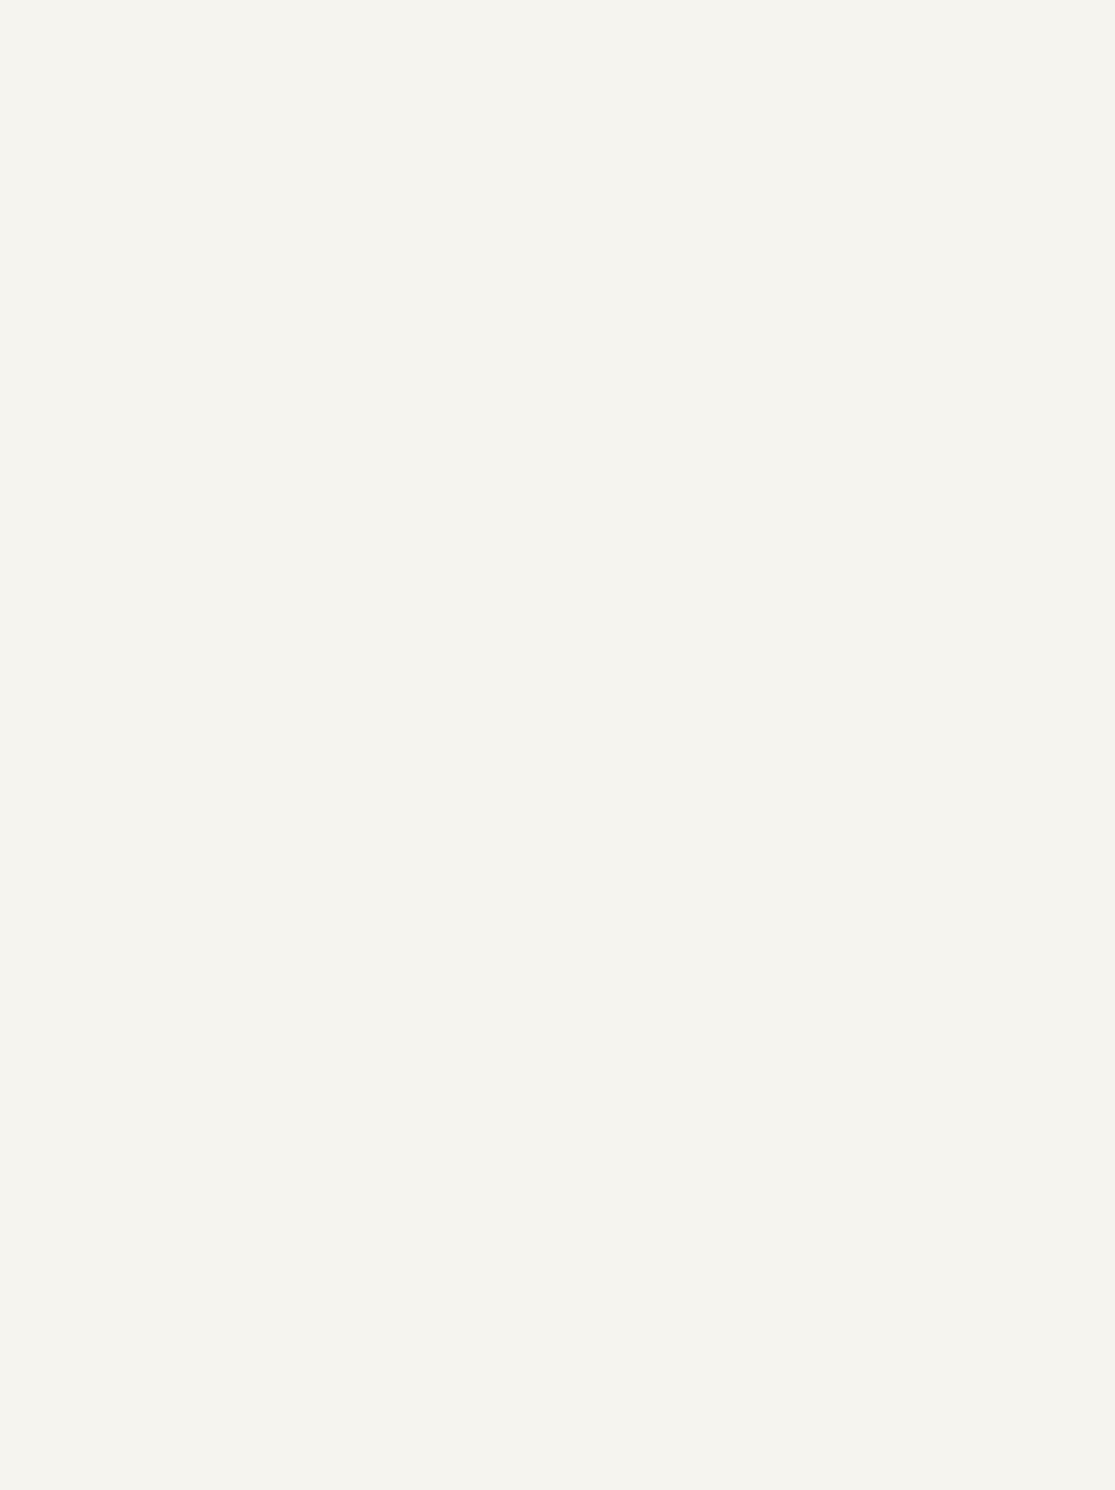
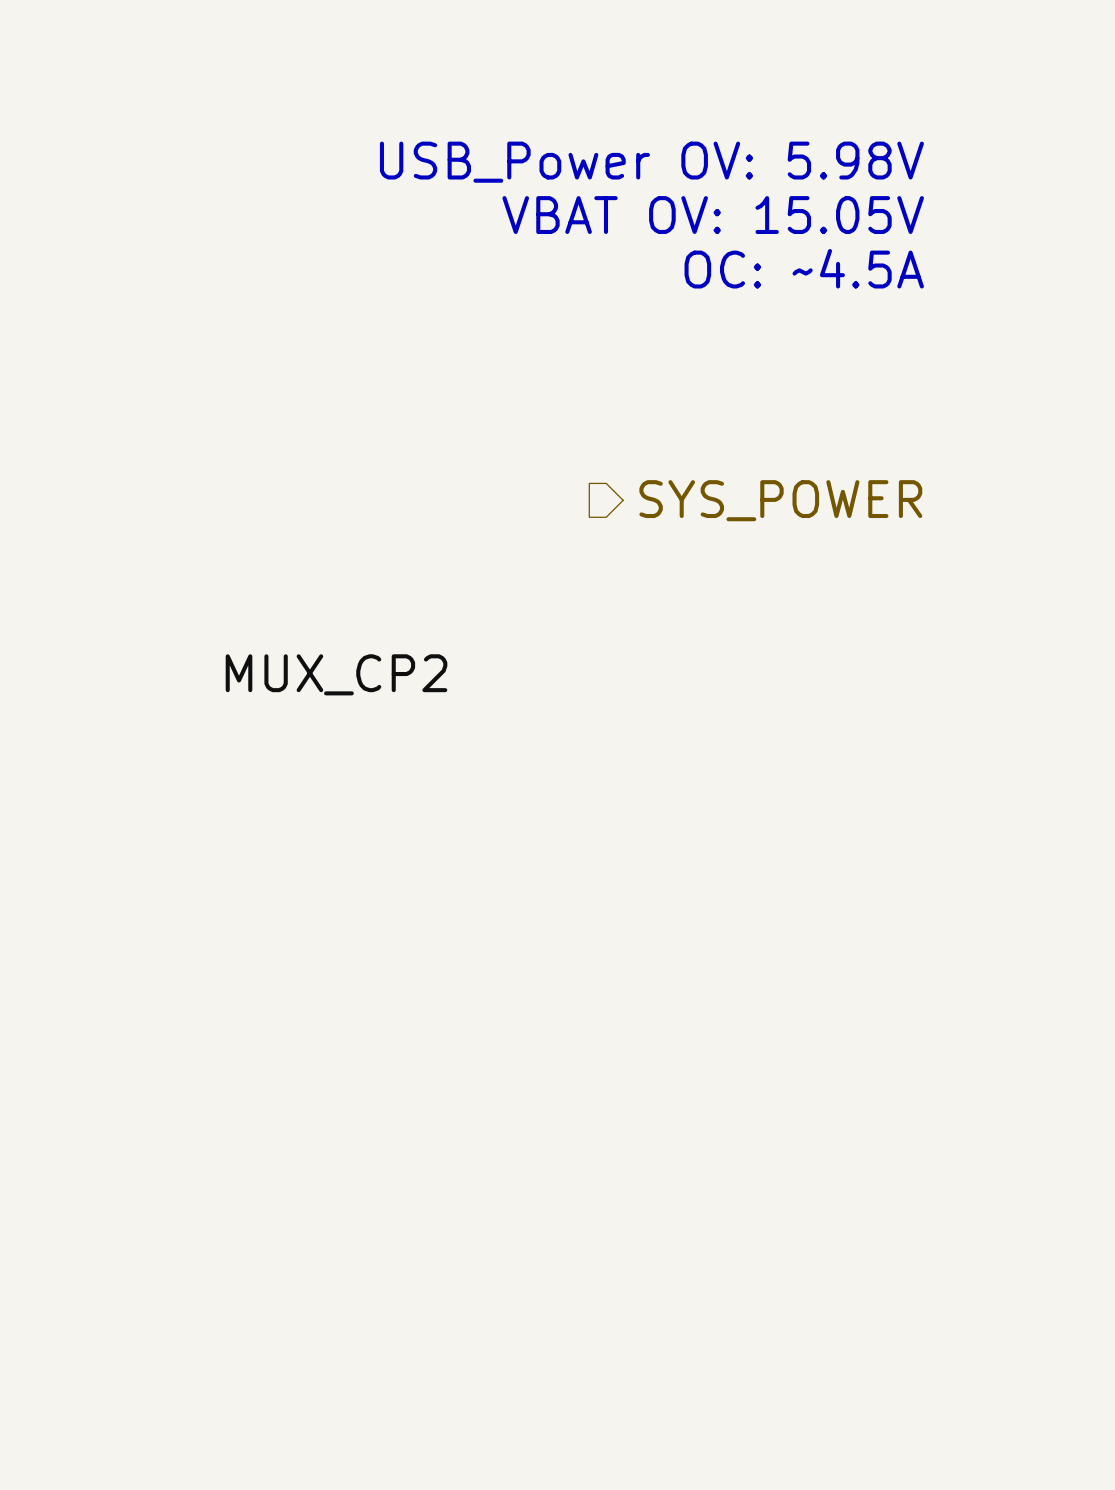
text: none -> USB_Power OV: 5.98V (651, 162)
text: none -> VBAT OV: 15.05V (713, 215)
text: none -> OC: ~4.5A (804, 268)
hierarchical label: none -> SYS_POWER (780, 500)
label: none -> MUX_CP2 (336, 674)

